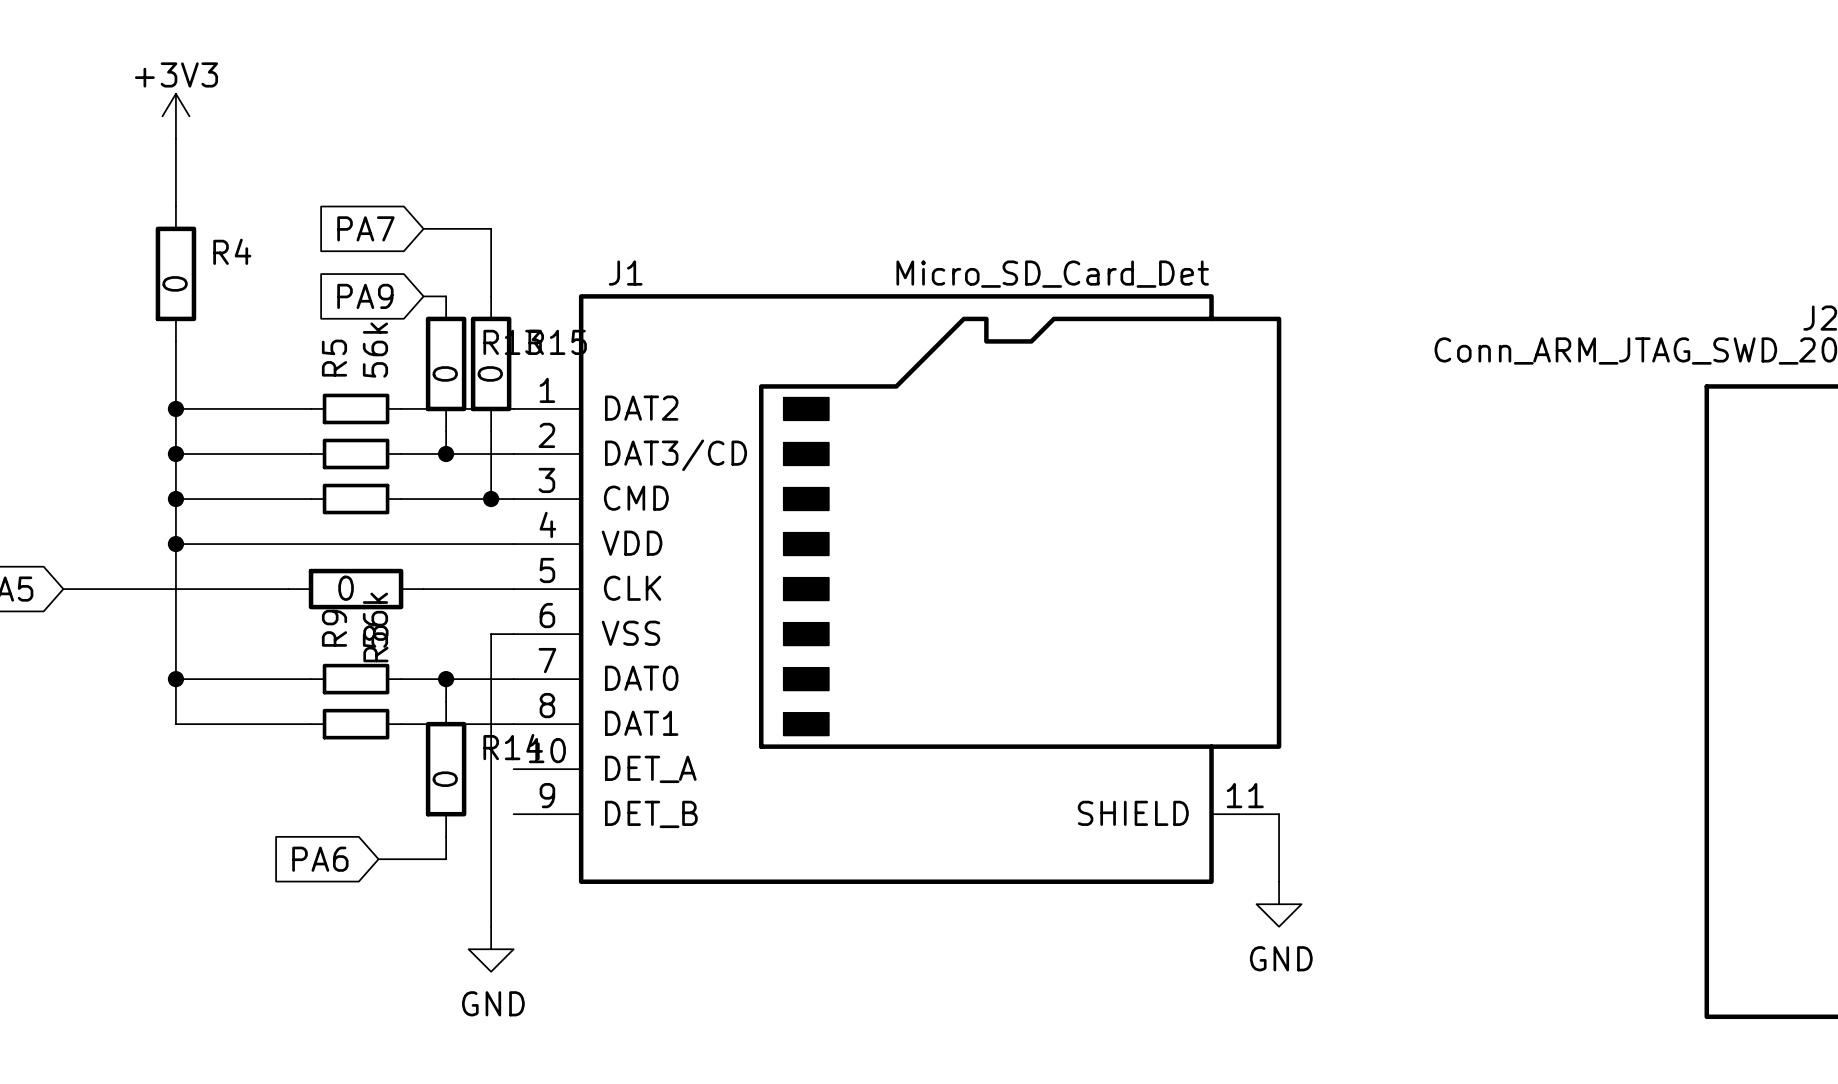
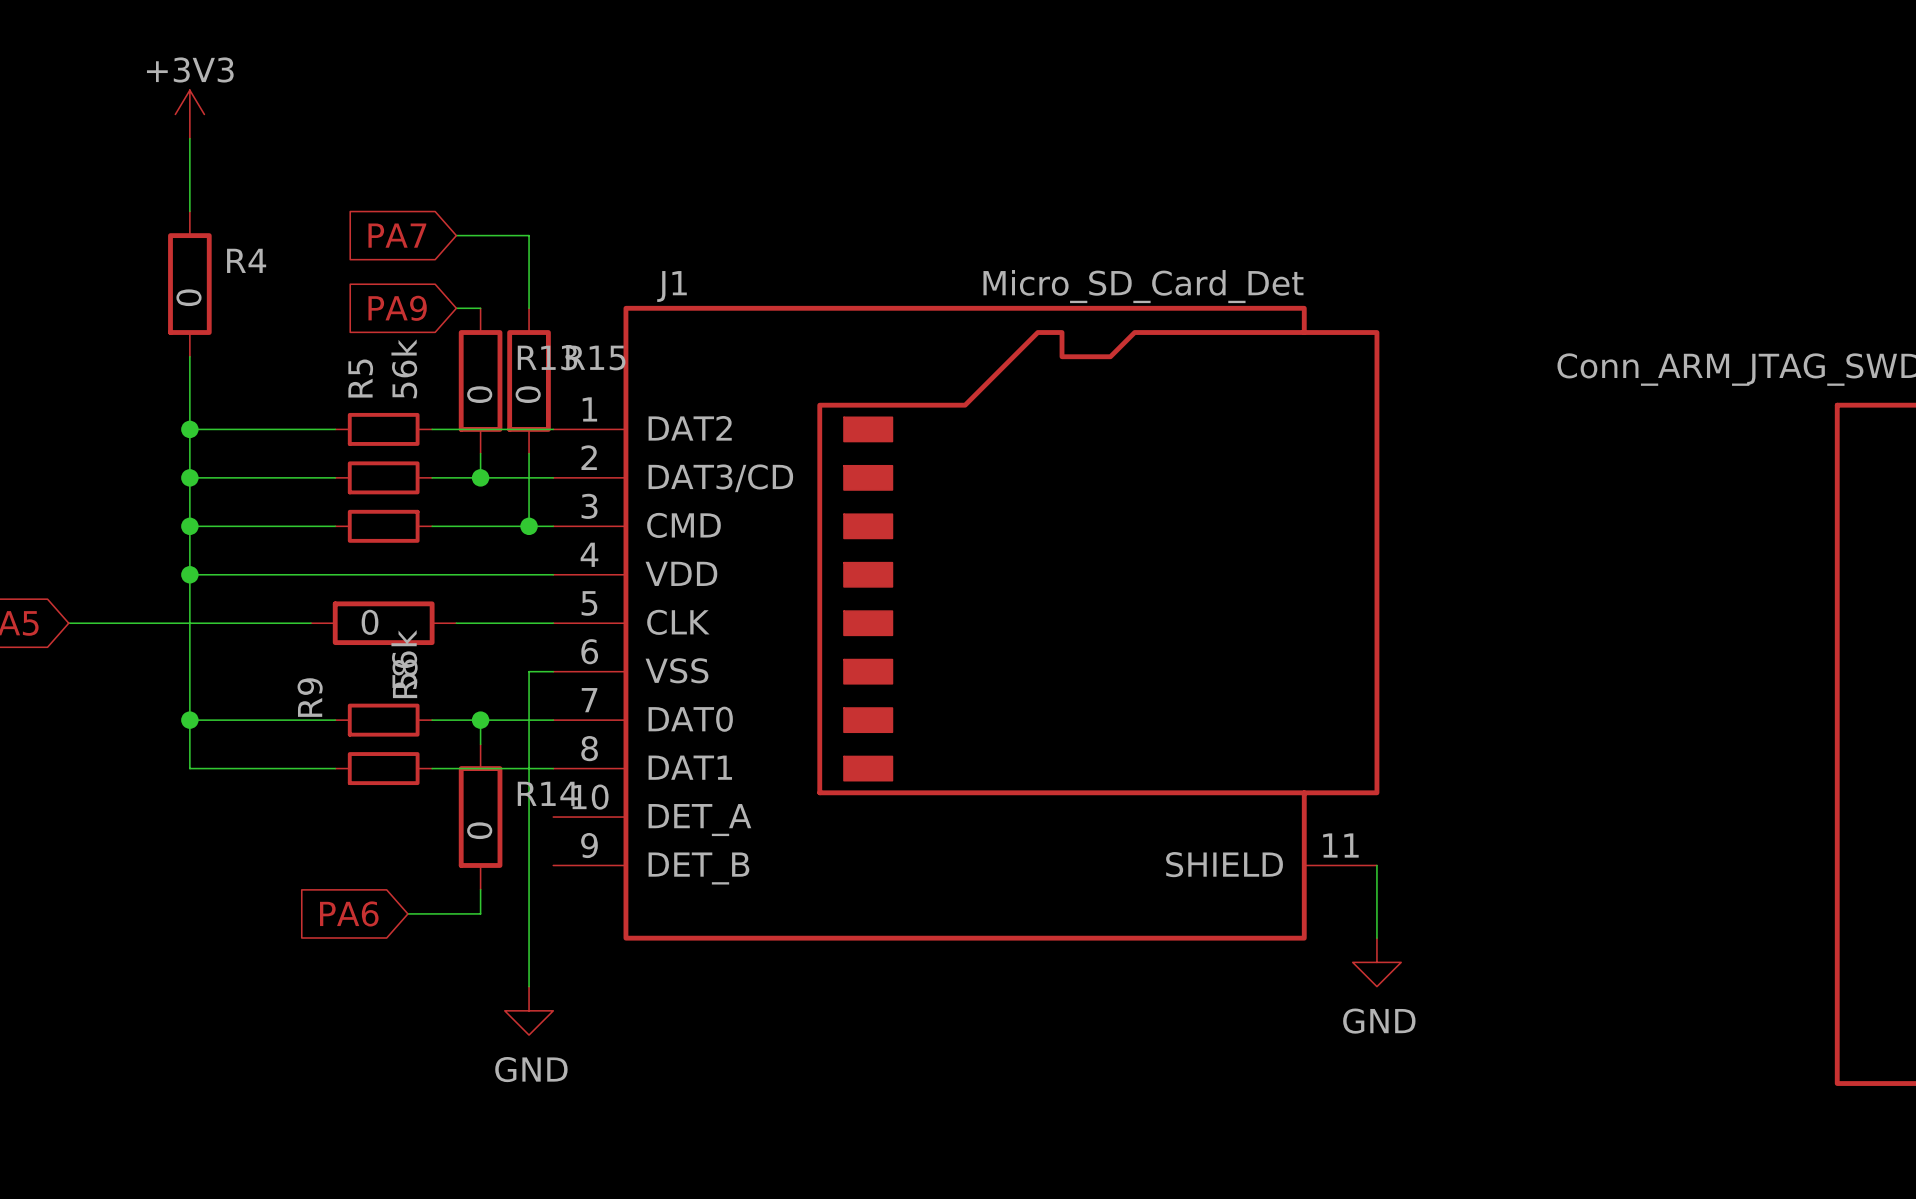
R9 name position: R9 (334, 628) -> R9 (310, 697)

